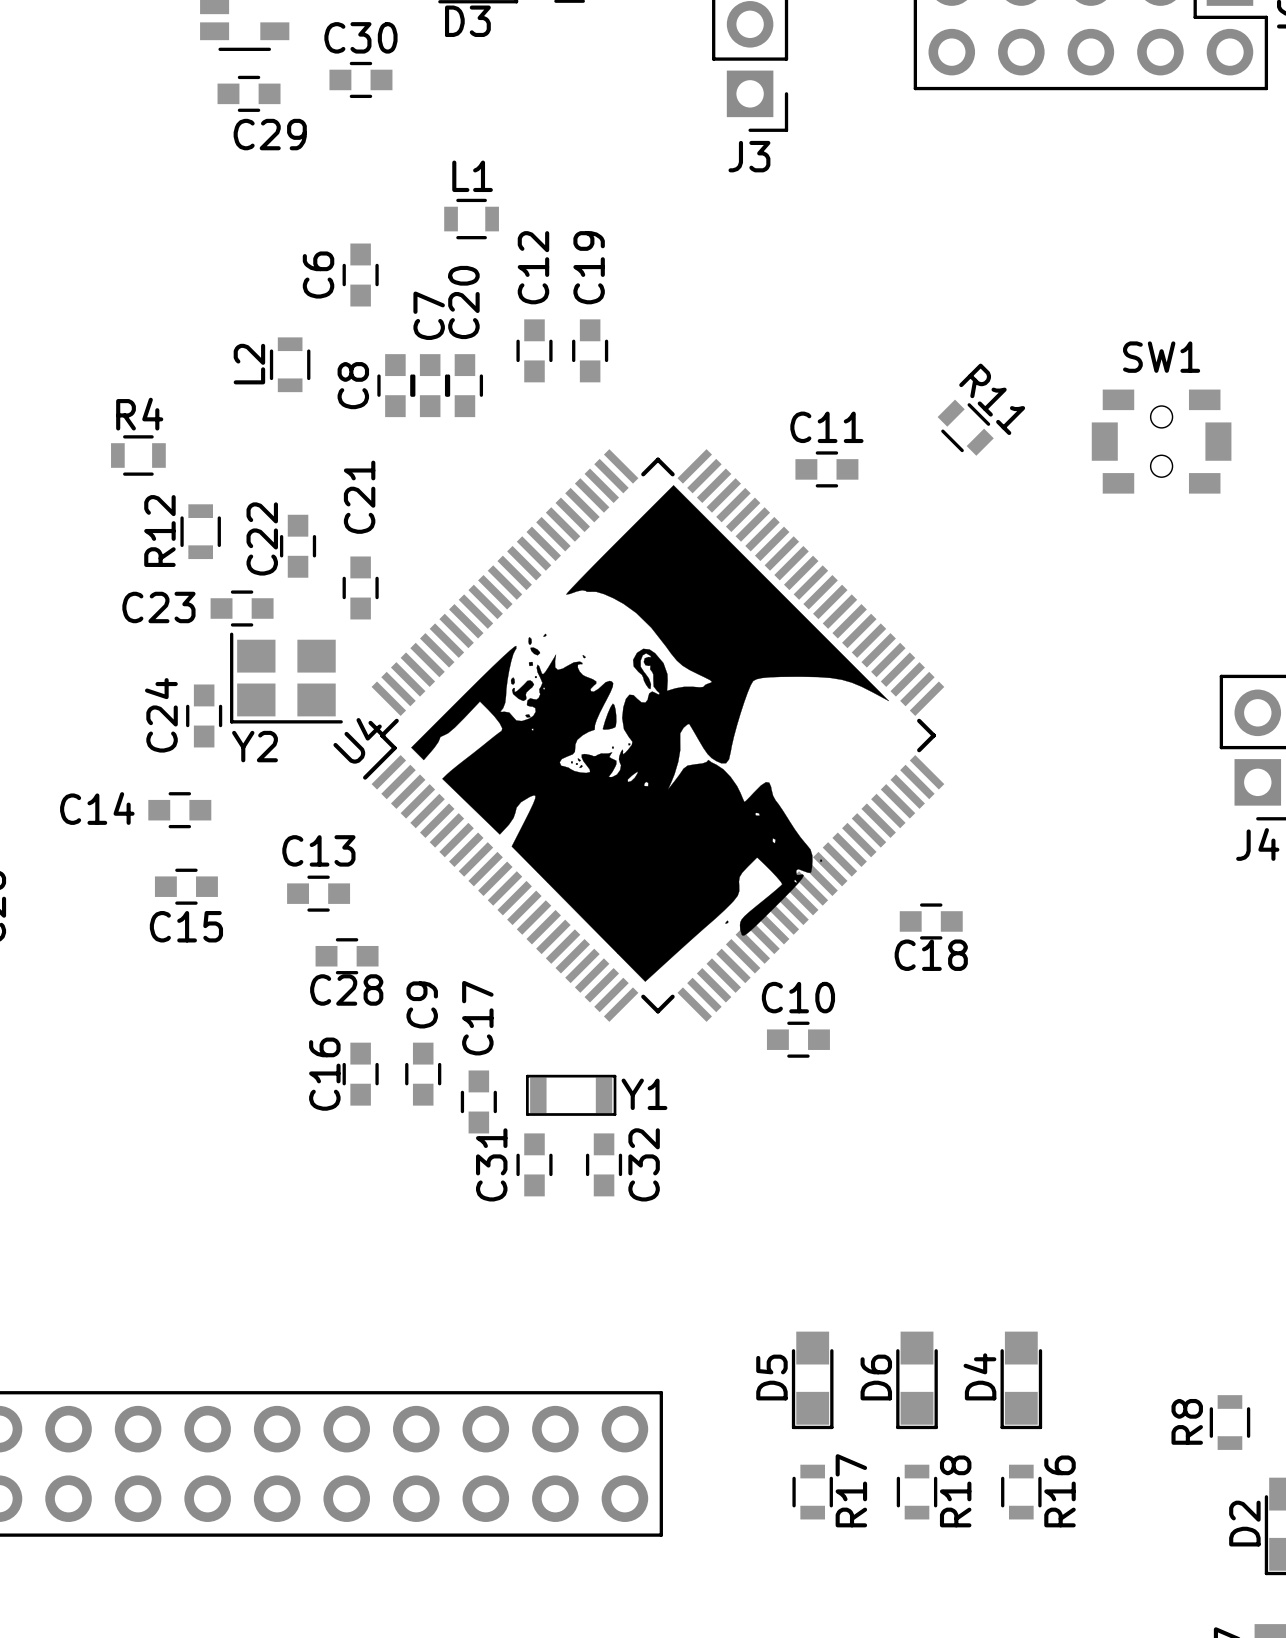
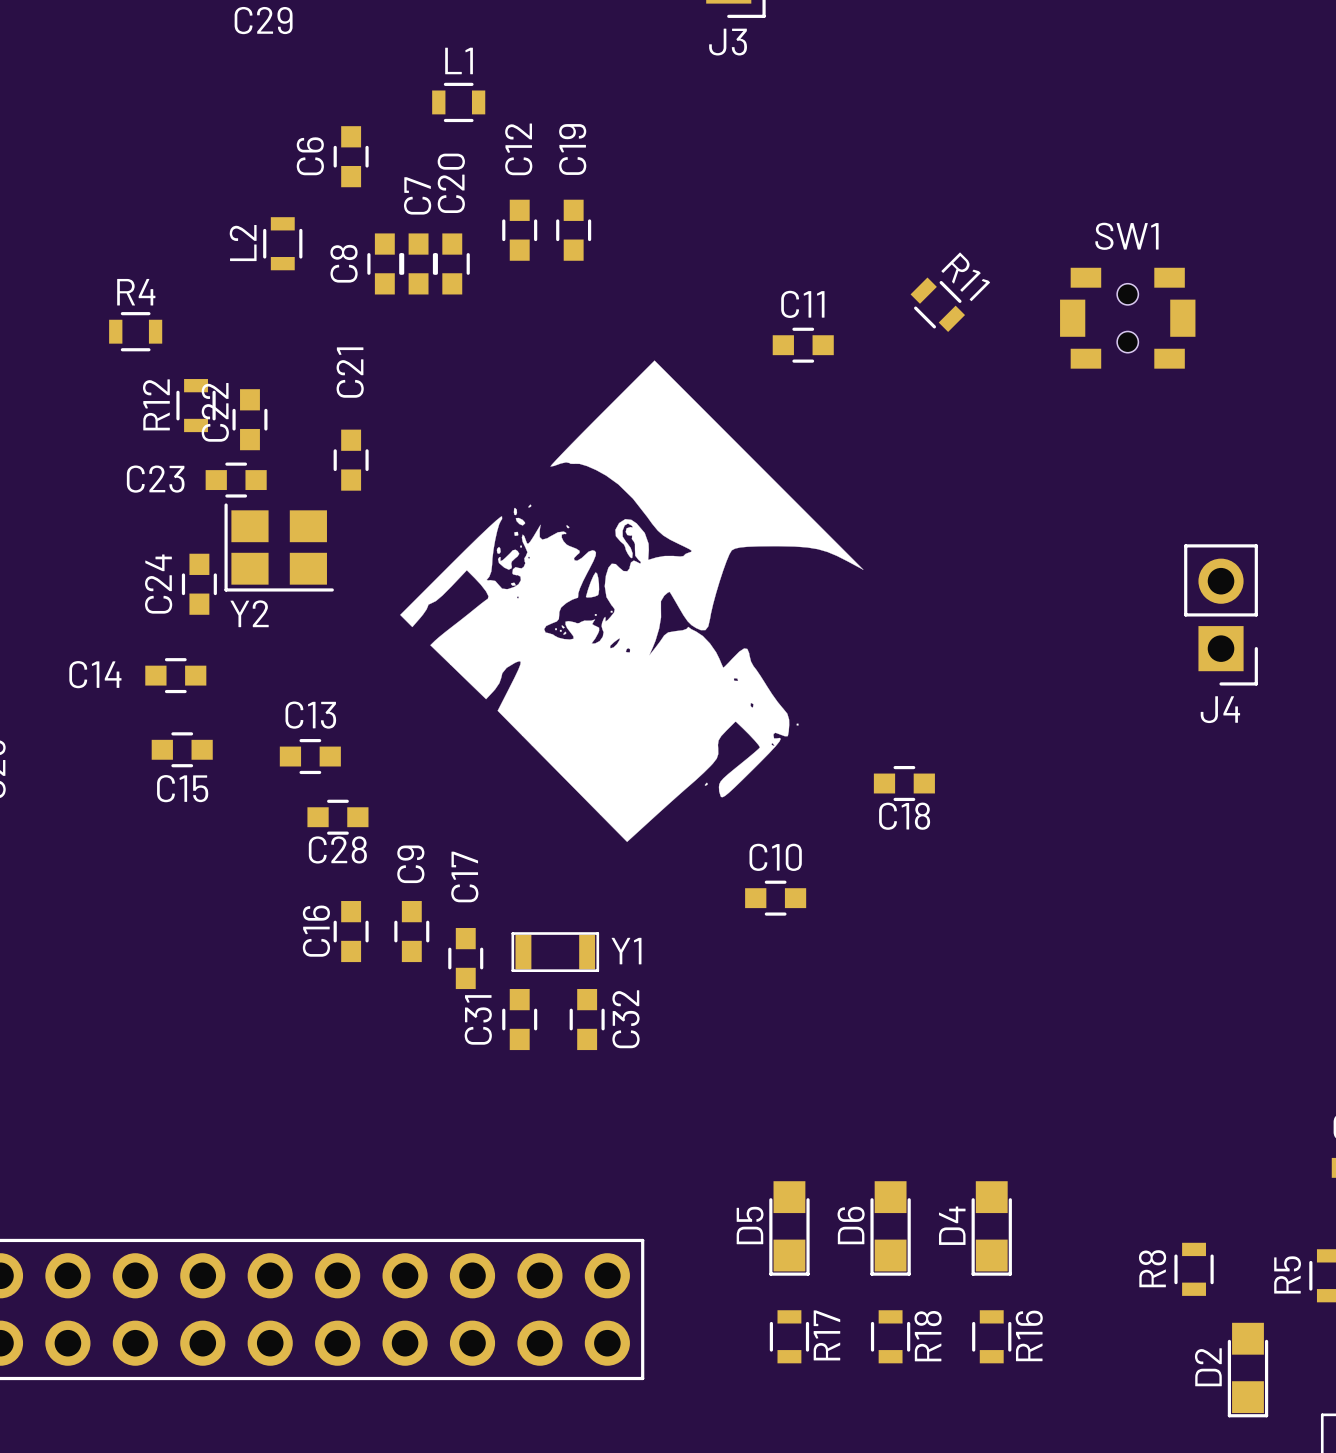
C22 position: (298, 546) -> (249, 419)
U4: (653, 735) -> none

